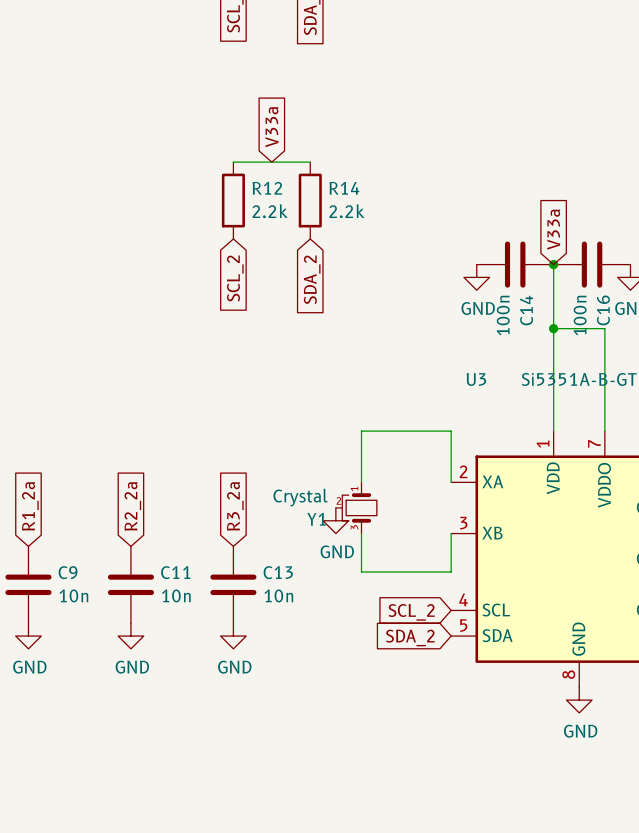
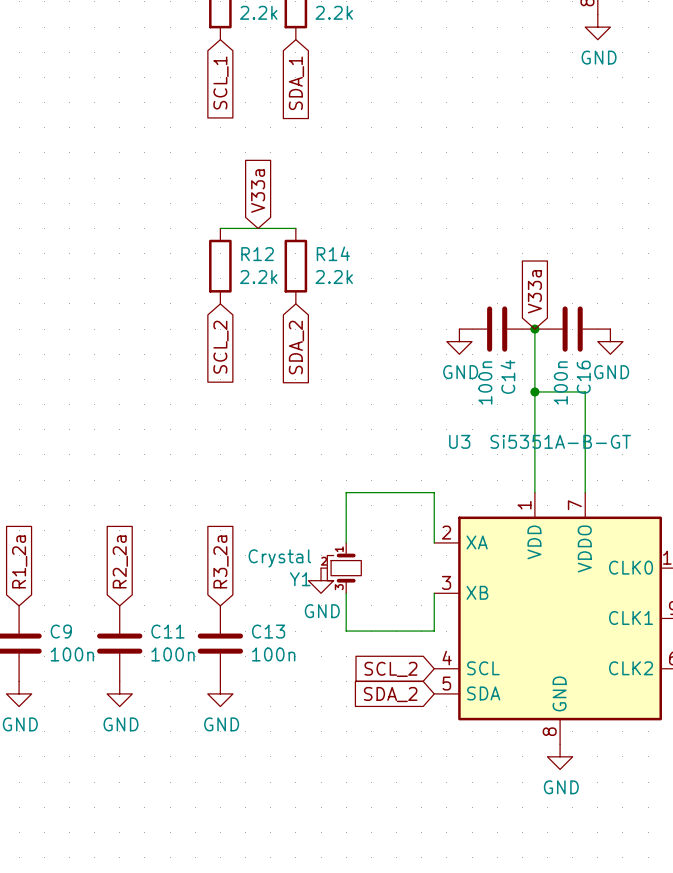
C9 value: 10n (73, 595) -> 100n (72, 654)
C11 value: 10n (176, 595) -> 100n (173, 654)
C13 value: 10n (278, 595) -> 100n (273, 654)

